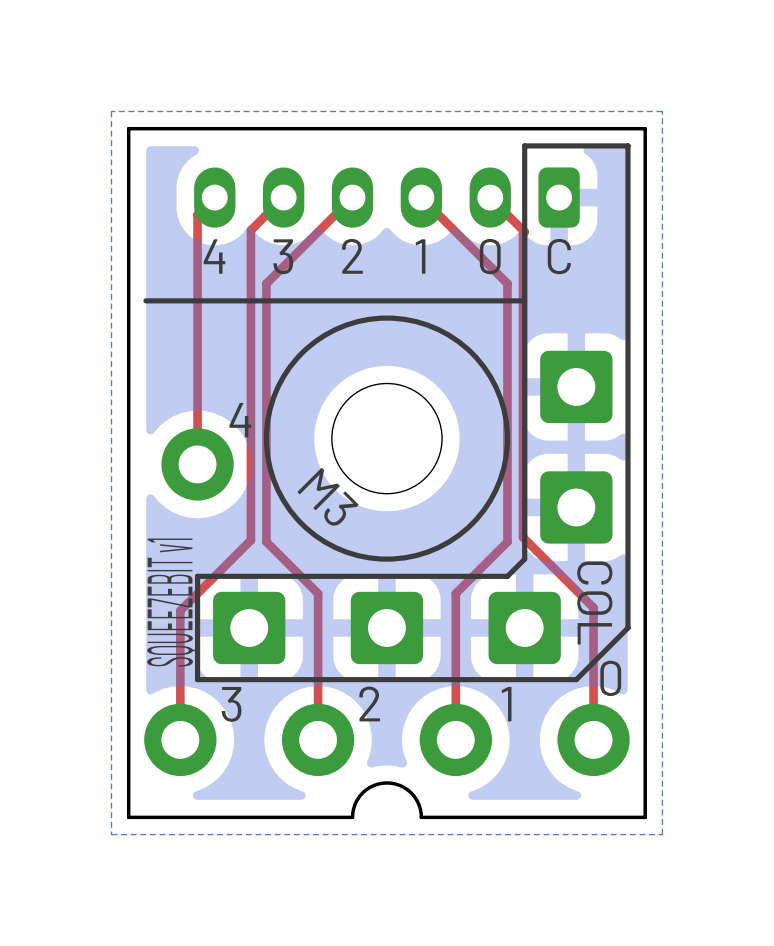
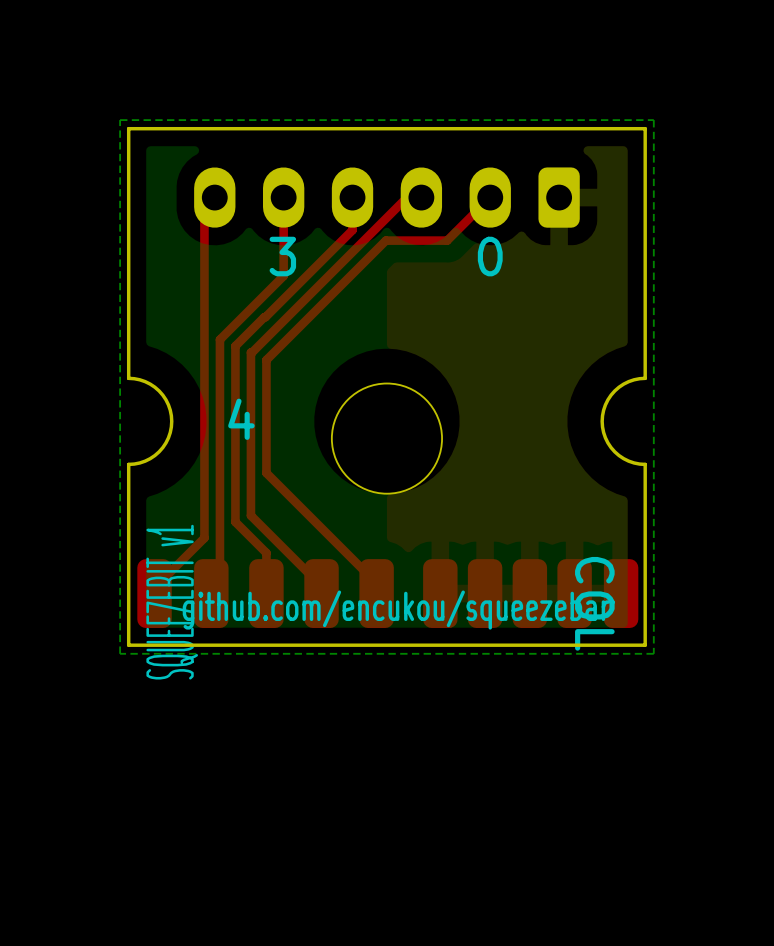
bottom zone outline: (662, 111) (662, 834) (111, 834) (111, 111) (662, 111) -> (653, 120) (653, 653) (120, 653) (120, 120) (653, 120)
line: (627, 145) (627, 627) (576, 679) (197, 679) (197, 576) (507, 576) (524, 559) (524, 145) (627, 145) -> none
top track: (283, 197) (250, 230) (250, 352) -> (421, 197) (407, 197) (250, 352)
top track: none -> (283, 197) (283, 275) (219, 339) (219, 584) (211, 593)
top track: (352, 197) (266, 283) (266, 360) -> (490, 197) (447, 240) (385, 240) (266, 360)
top track: none -> (352, 197) (352, 230) (235, 346) (235, 522) (266, 553) (266, 593)
top track: (421, 197) (507, 283) (507, 541) (455, 593) (455, 739) -> none
top track: (490, 197) (524, 232) (522, 233) (522, 537) (593, 607) (593, 739) -> none
top track: (204, 207) (197, 214) (197, 464) -> (204, 207) (204, 538) (154, 587) (154, 593)
text: 4 (214, 256) -> none
text: 2 (352, 256) -> none
text: 1 (420, 256) -> none
text: C (559, 256) -> none
line: (524, 300) (145, 300) -> none
drawing: [263, 315, 511, 562] -> none
board edge: (128, 378) (128, 464) -> (128, 378) (145, 381) (159, 390) (168, 404) (171, 421) (168, 437) (159, 451) (145, 461) (128, 464)
board edge: (645, 378) (645, 464) -> (645, 378) (628, 381) (614, 390) (605, 404) (602, 421) (605, 437) (614, 451) (628, 461) (645, 464)
part: (576, 386) -> none
part: (197, 464) -> none
top track: (266, 473) (266, 541) (318, 593) (318, 739) -> (266, 473) (376, 583) (376, 593)
text: M3 (328, 496) -> none
part: (576, 507) -> none
top track: (250, 515) (250, 540) (180, 610) (180, 739) -> (250, 515) (321, 586) (321, 593)
part: none -> (154, 593)
part: none -> (211, 593)
part: none -> (266, 593)
part: none -> (321, 593)
part: none -> (376, 593)
part: none -> (440, 593)
part: none -> (485, 593)
part: none -> (529, 593)
part: none -> (574, 593)
part: none -> (621, 593)
text: none -> github.com/encukou/squeezebar (396, 610)
part: (249, 627) -> none
part: (386, 627) -> none
part: (524, 627) -> none
board edge: (645, 645) (645, 817) (421, 817) (418, 804) (411, 793) (400, 785) (386, 782) (373, 785) (362, 793) (355, 804) (352, 817) (128, 817) (128, 645) -> (645, 645) (128, 645)
text: 0 (610, 678) -> none
text: 2 (369, 703) -> none
text: 3 (231, 704) -> none
text: 1 (506, 704) -> none
part: (180, 739) -> none
part: (318, 739) -> none
part: (455, 739) -> none
part: (593, 739) -> none

